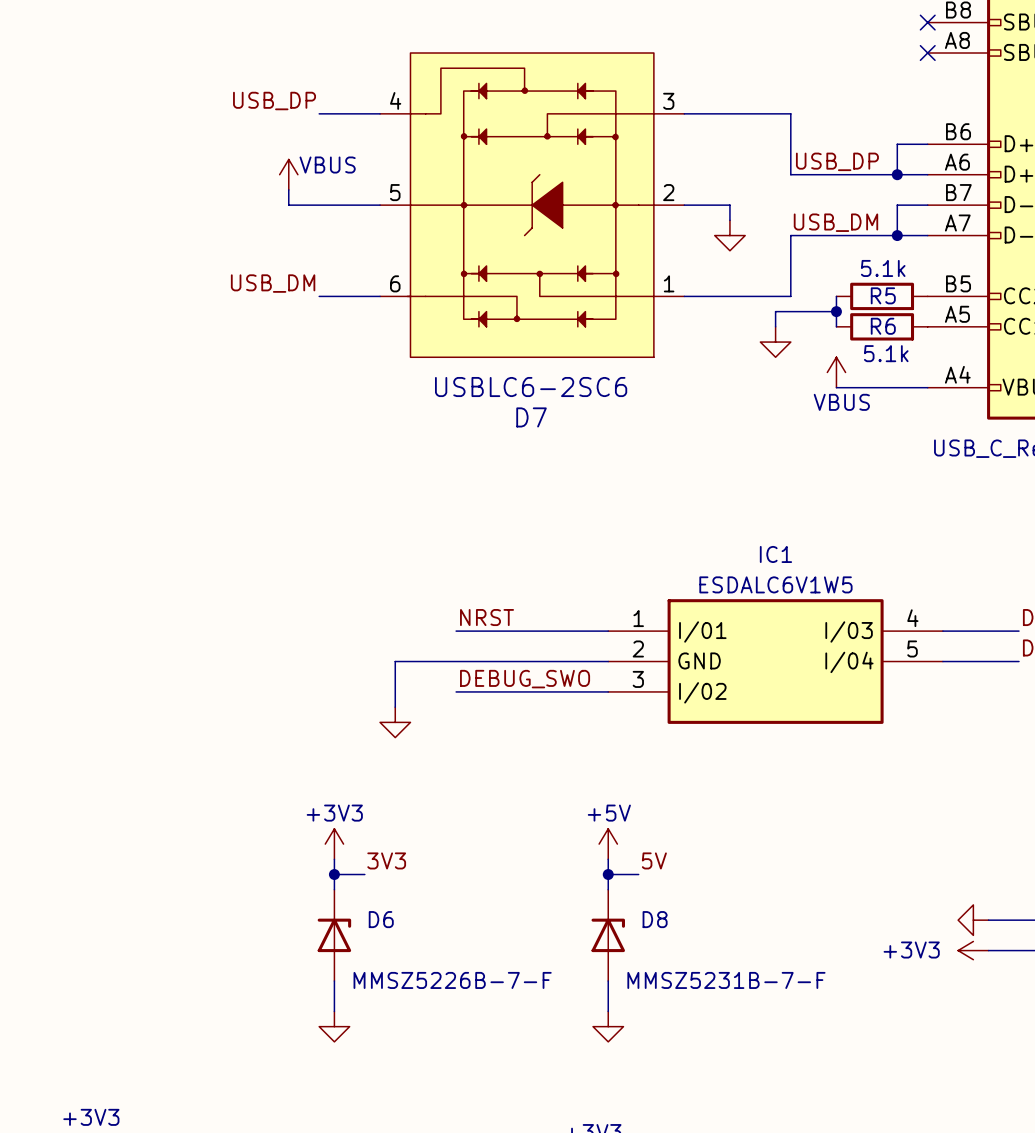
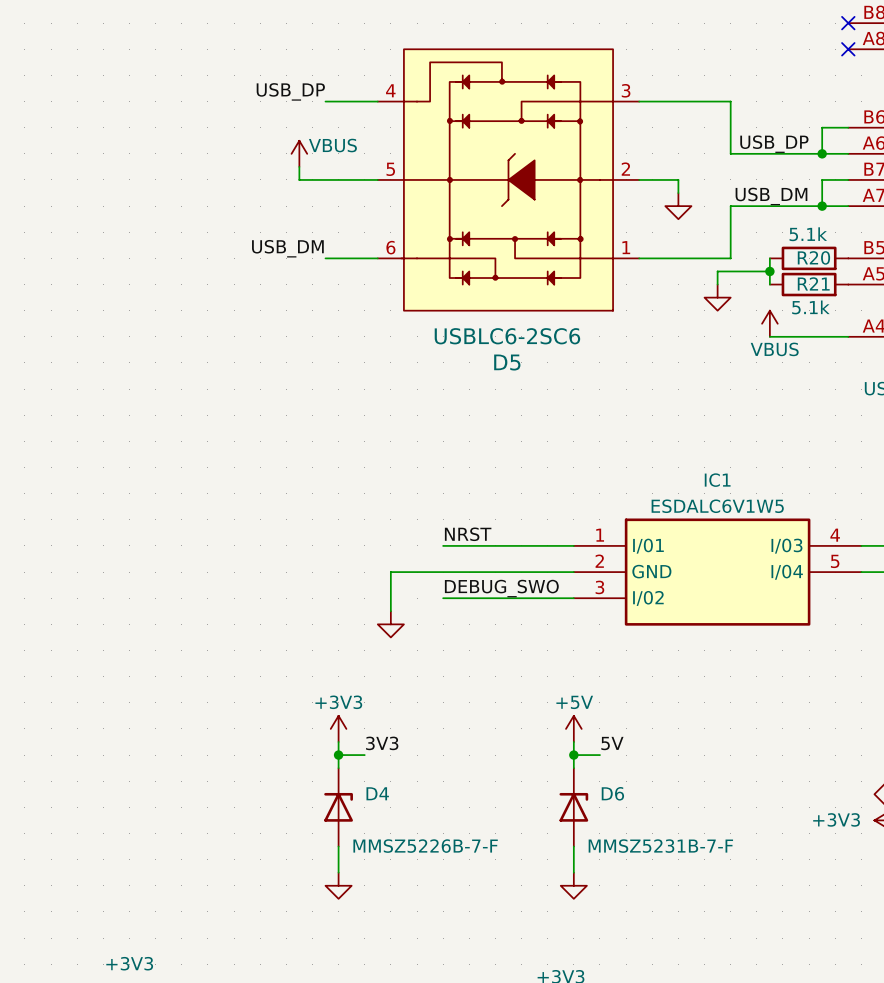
R5 name: R5 (883, 295) -> R20 (813, 257)
R6 name: R6 (883, 326) -> R21 (813, 283)
D7 name: D7 (531, 417) -> D5 (507, 362)
D6 name: D6 (381, 919) -> D4 (377, 793)
D8 name: D8 (655, 919) -> D6 (612, 793)

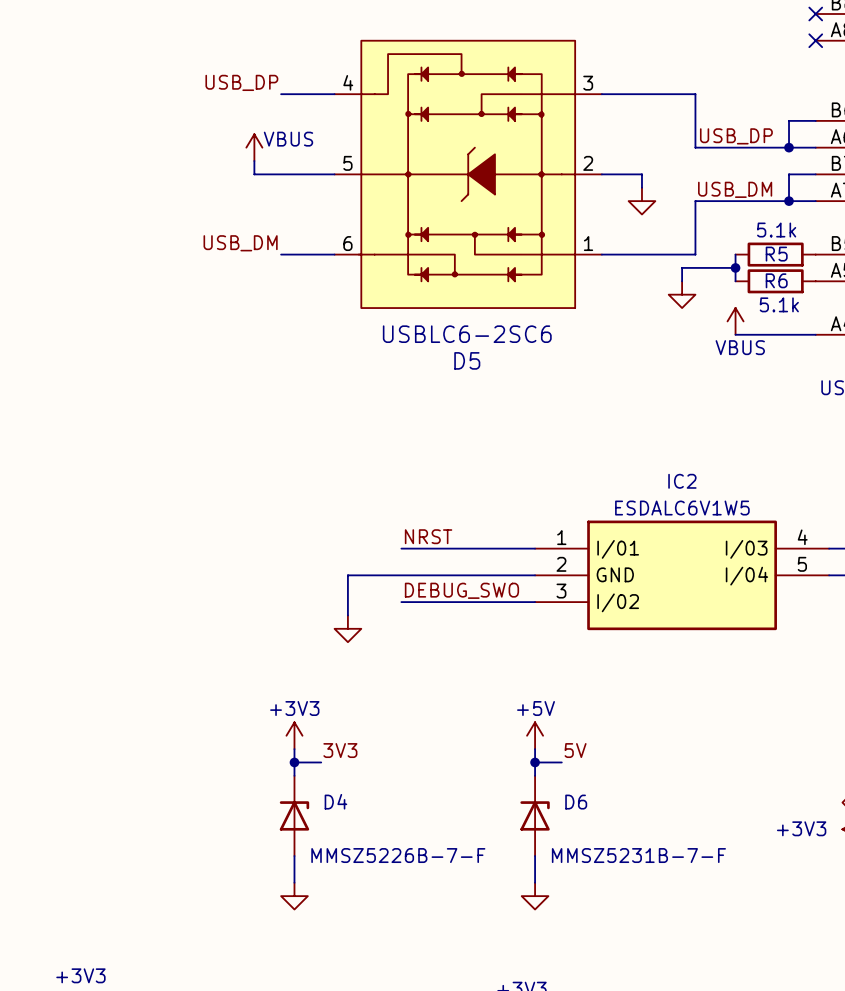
R20 name: R20 (813, 257) -> R5 (776, 254)
R21 name: R21 (813, 283) -> R6 (776, 280)
IC1 name: IC1 (717, 480) -> IC2 (682, 481)

